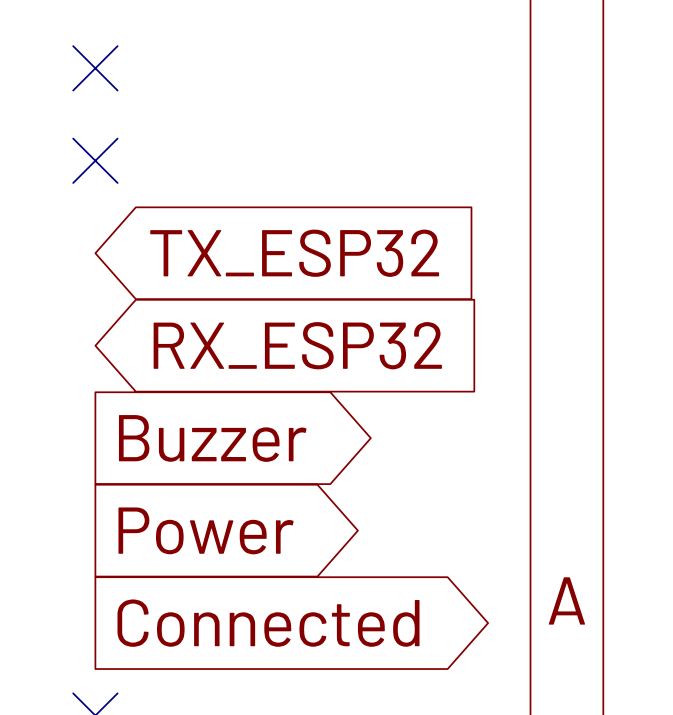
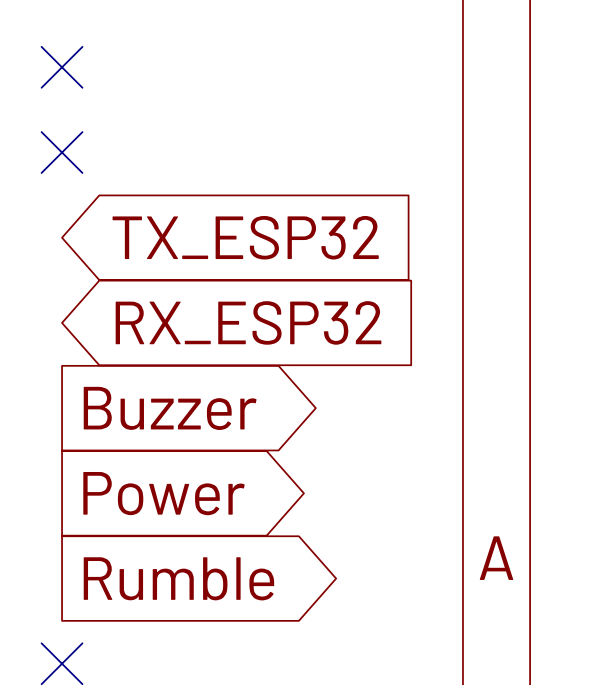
global label: Connected (268, 623) -> Rumble (178, 578)

